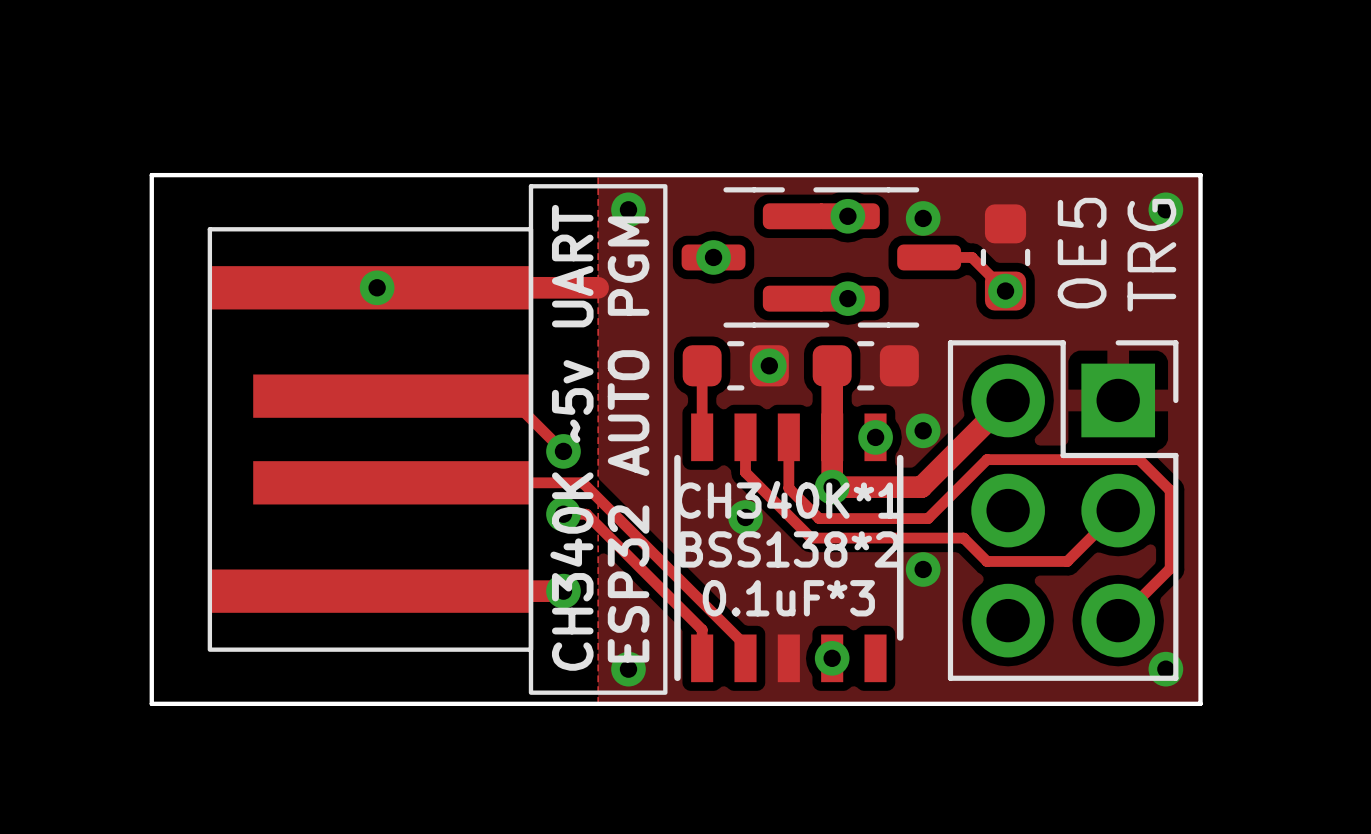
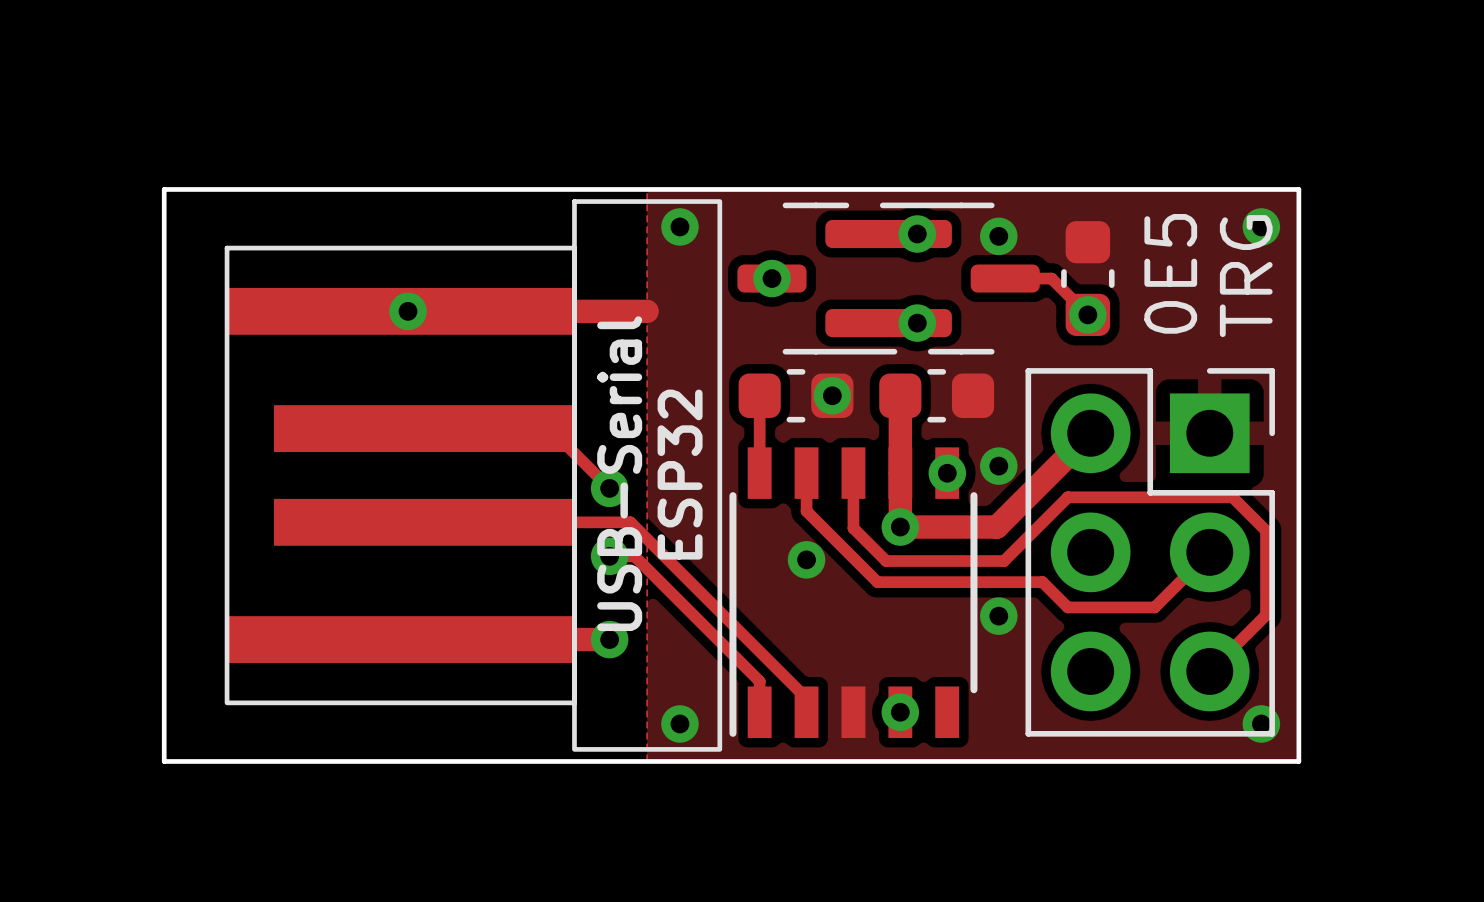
text: CH340K ~5v UART (571, 437) -> USB-Serial (619, 473)
text: ESP32 AUTO PGM (628, 439) -> ESP32 (680, 474)
text: CH340K*1 (788, 499) -> none
text: BSS138*2 (789, 549) -> none
text: 0.1uF*3 (788, 598) -> none

